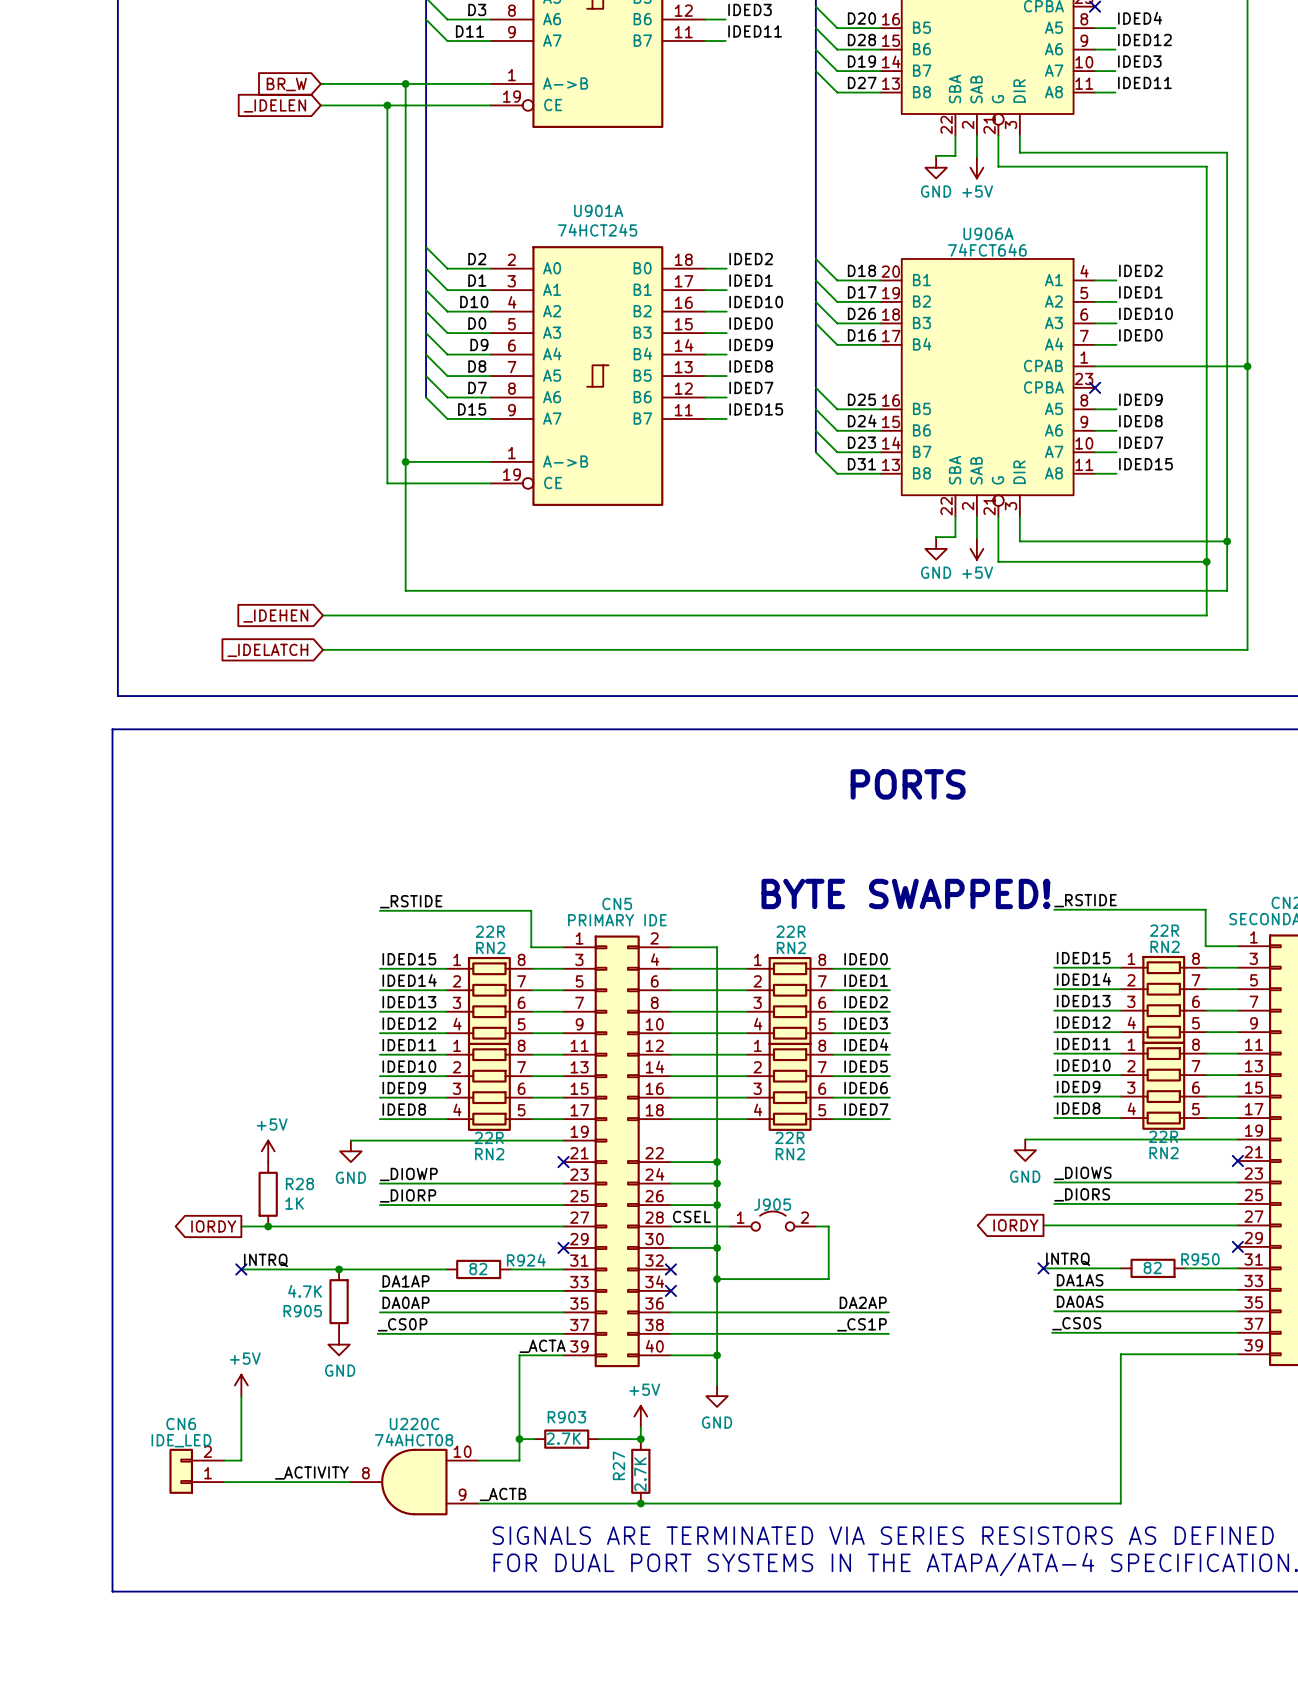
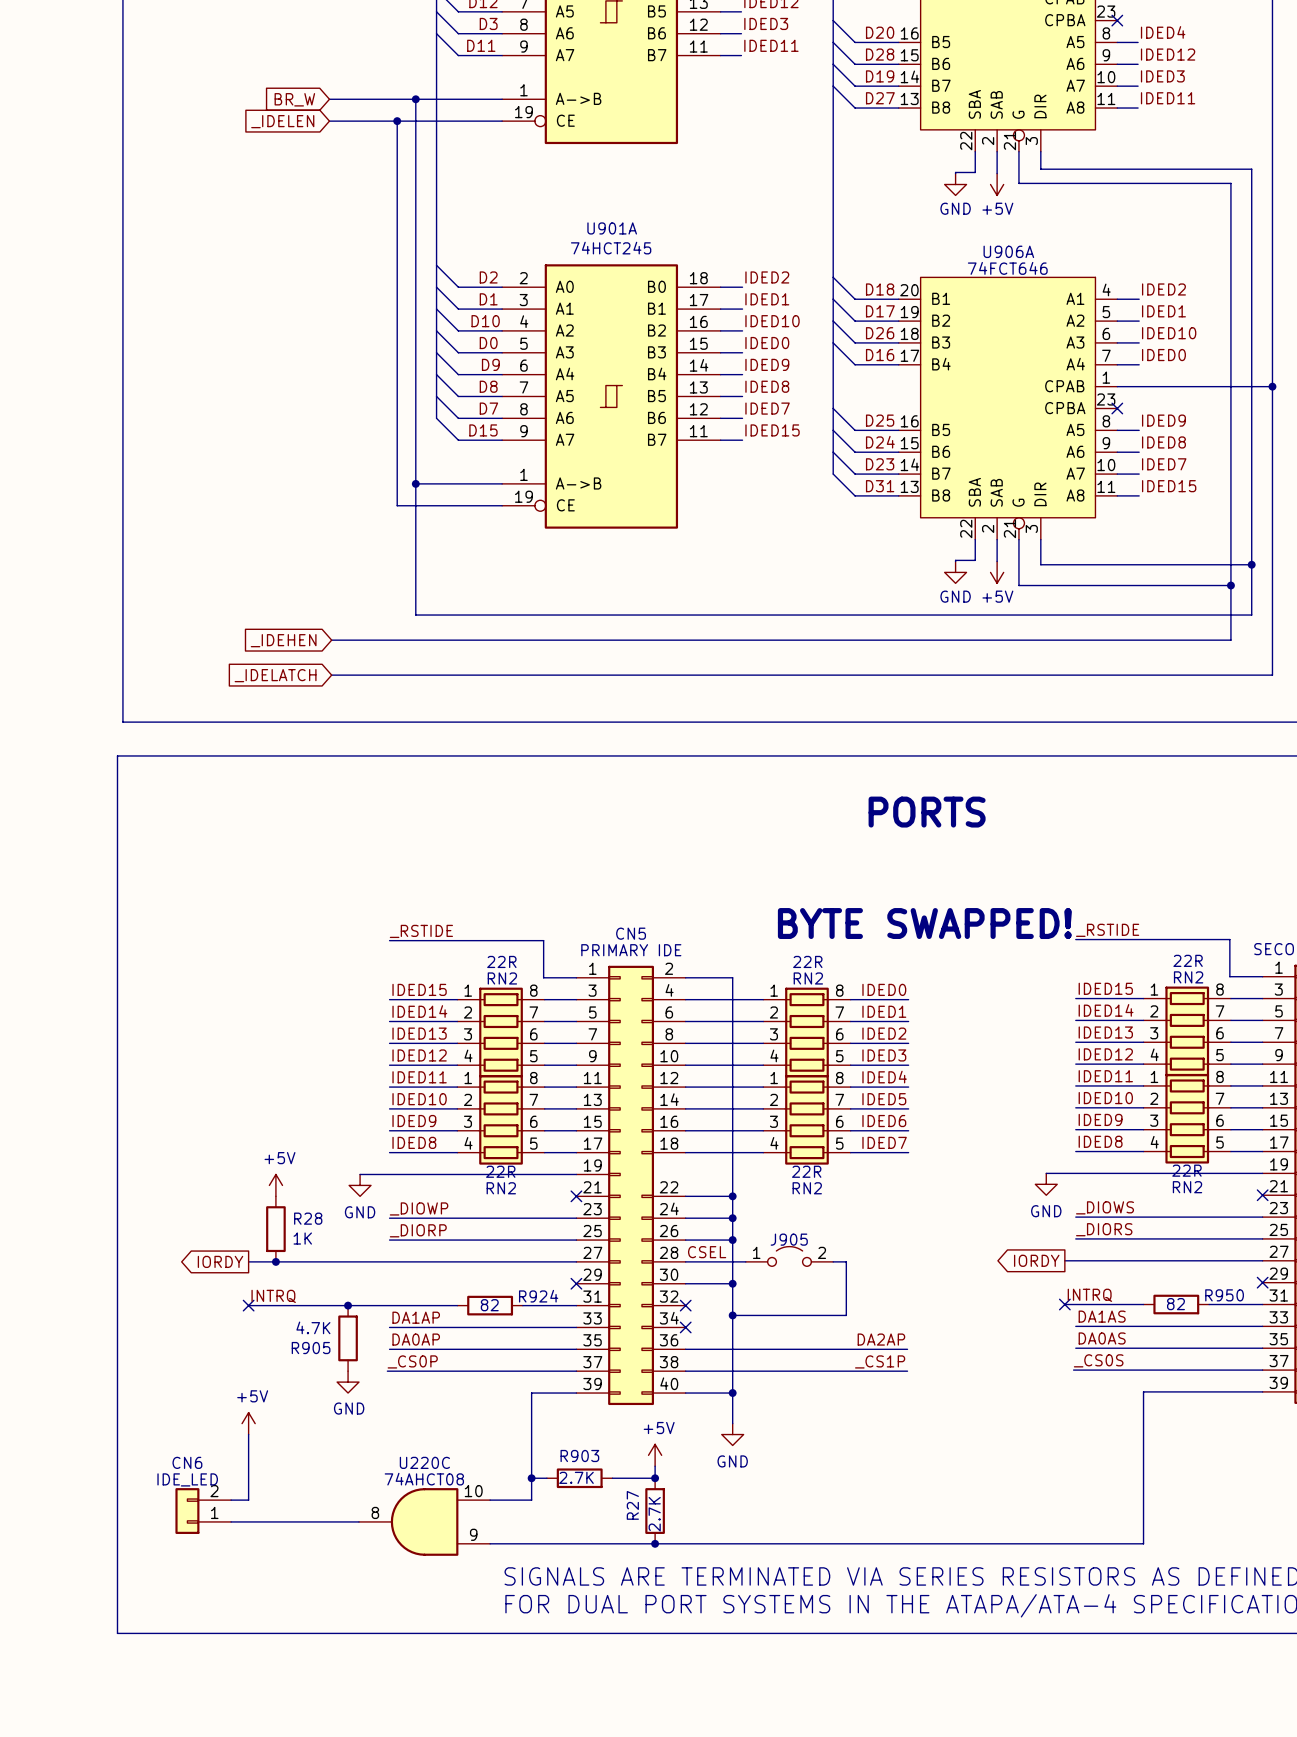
label: _ACTA (542, 1346) -> none
label: _ACTIVITY (311, 1472) -> none
label: _ACTB (503, 1494) -> none

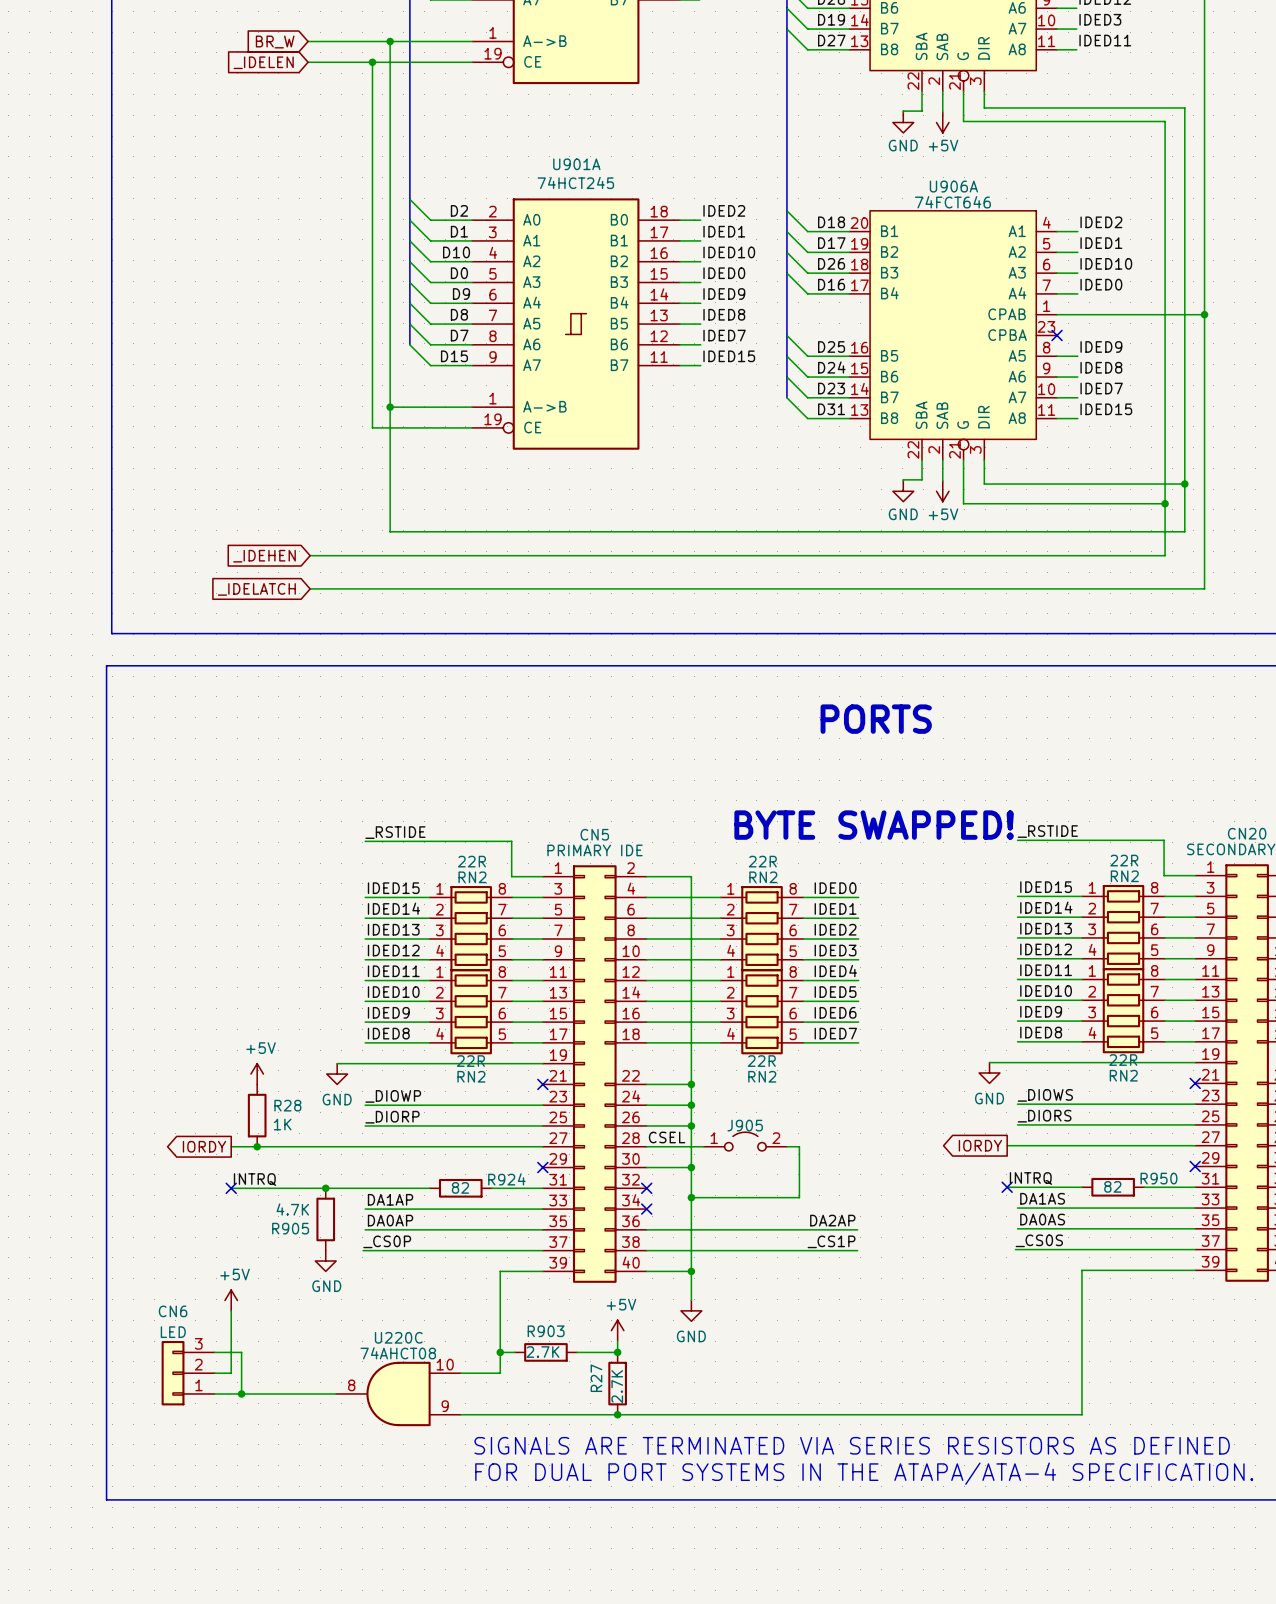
wire: none -> (214, 1352) (241, 1352) (241, 1393)
CN6 value: IDE_LED (187, 1479) -> LED (173, 1332)
CN6 symbol: [175, 1488, 232, 1534] -> [161, 1341, 215, 1406]
junction: none -> (241, 1393)

